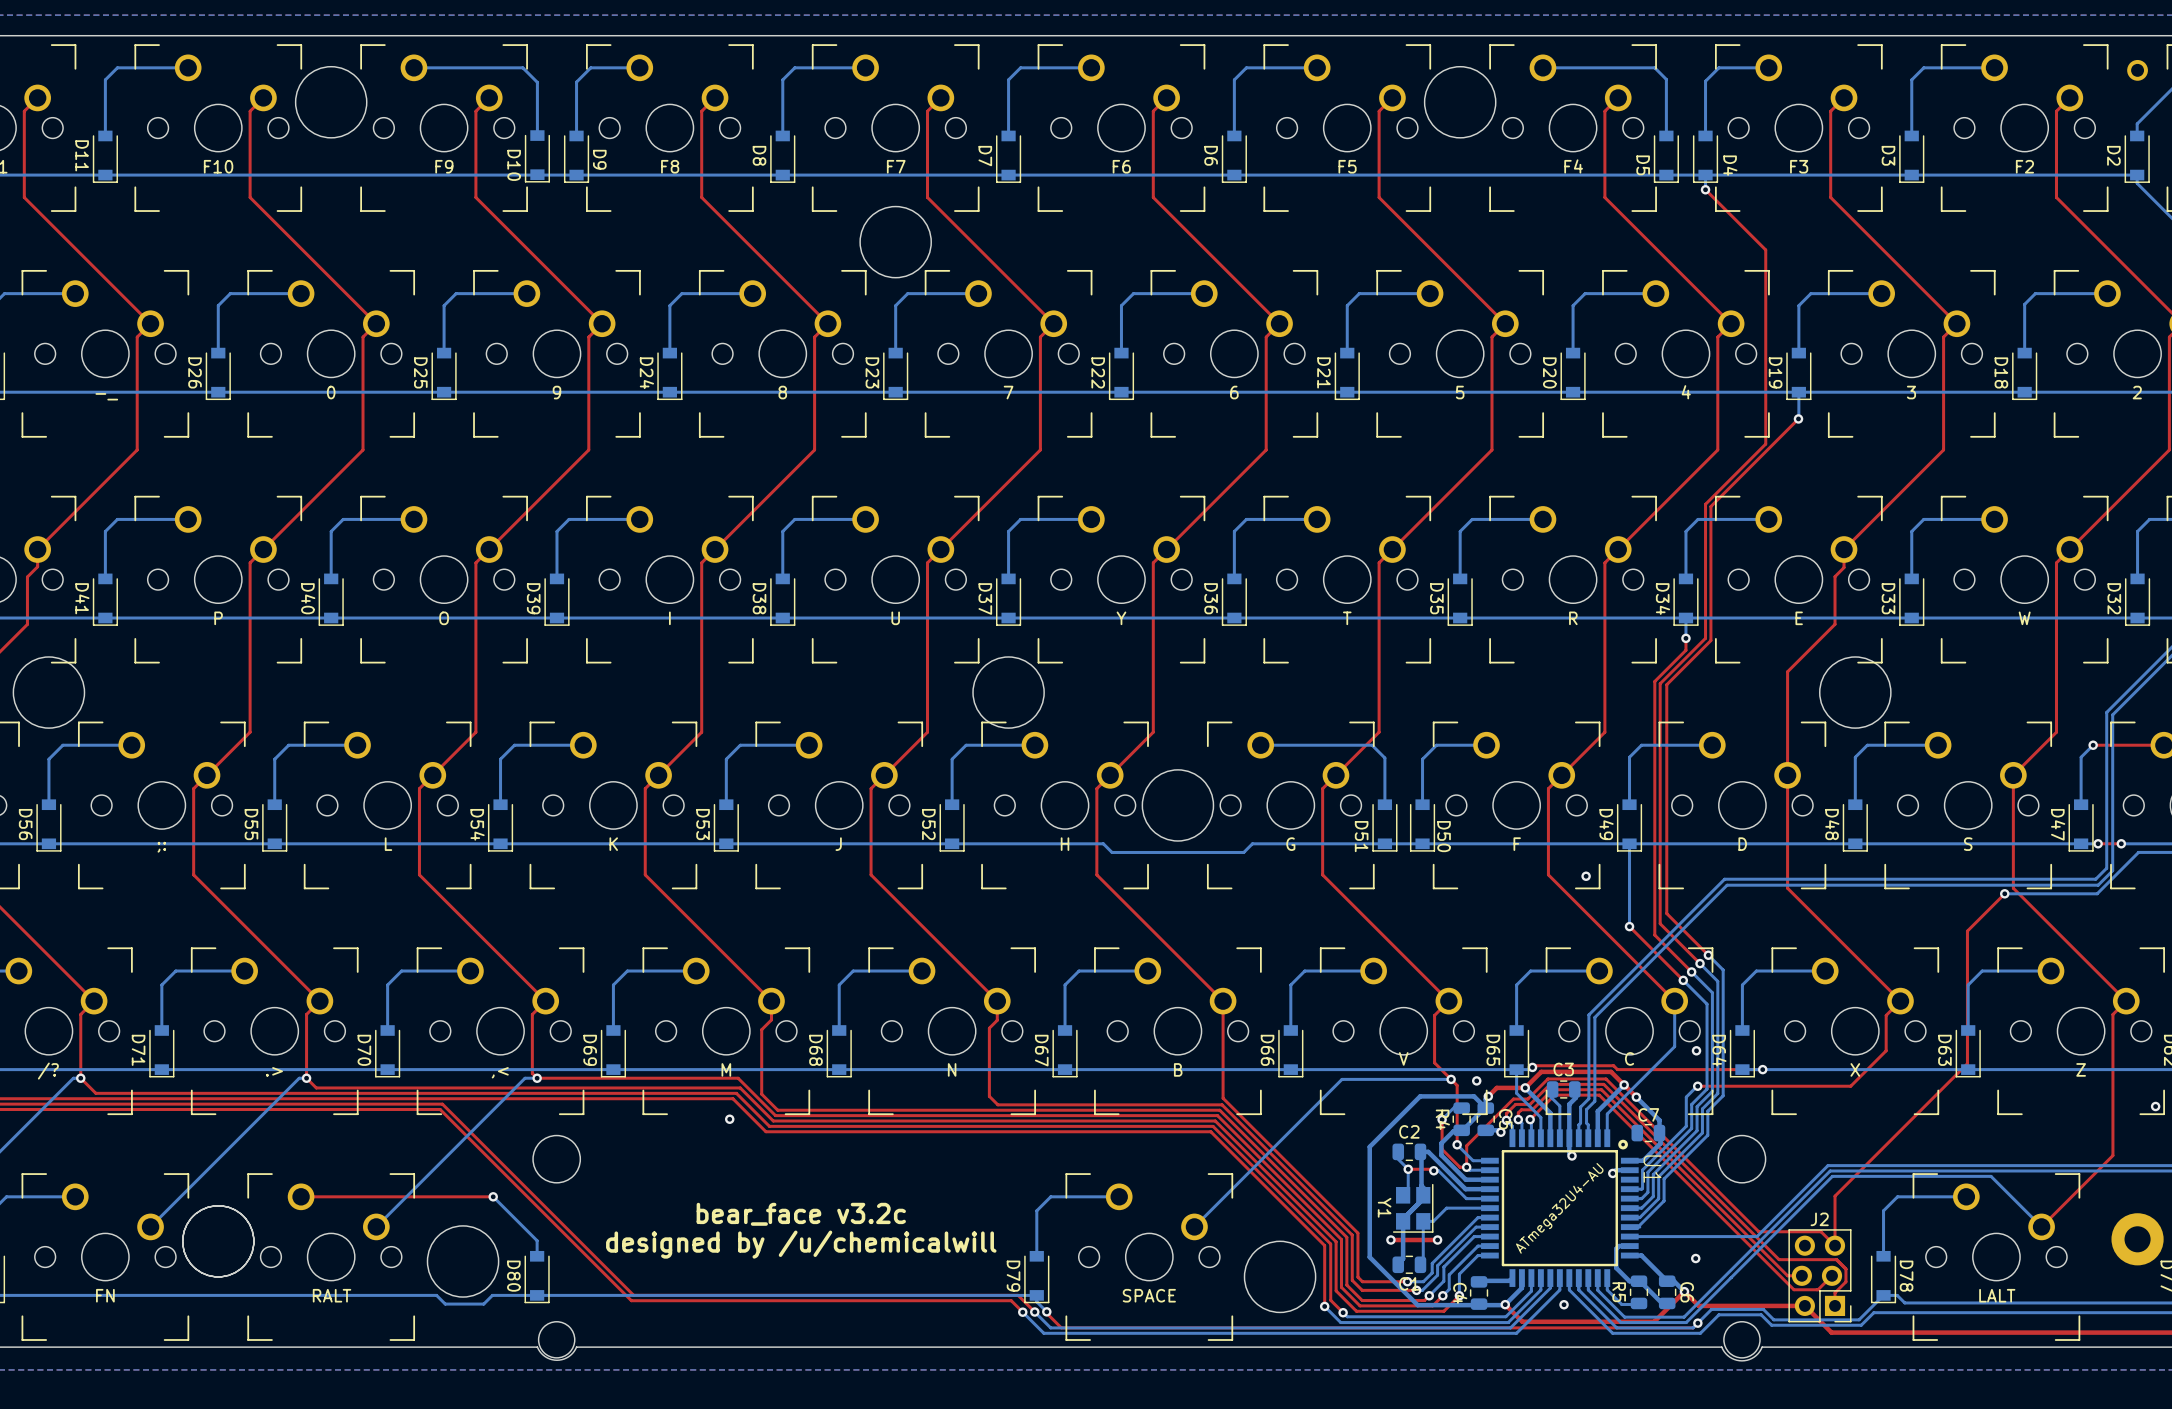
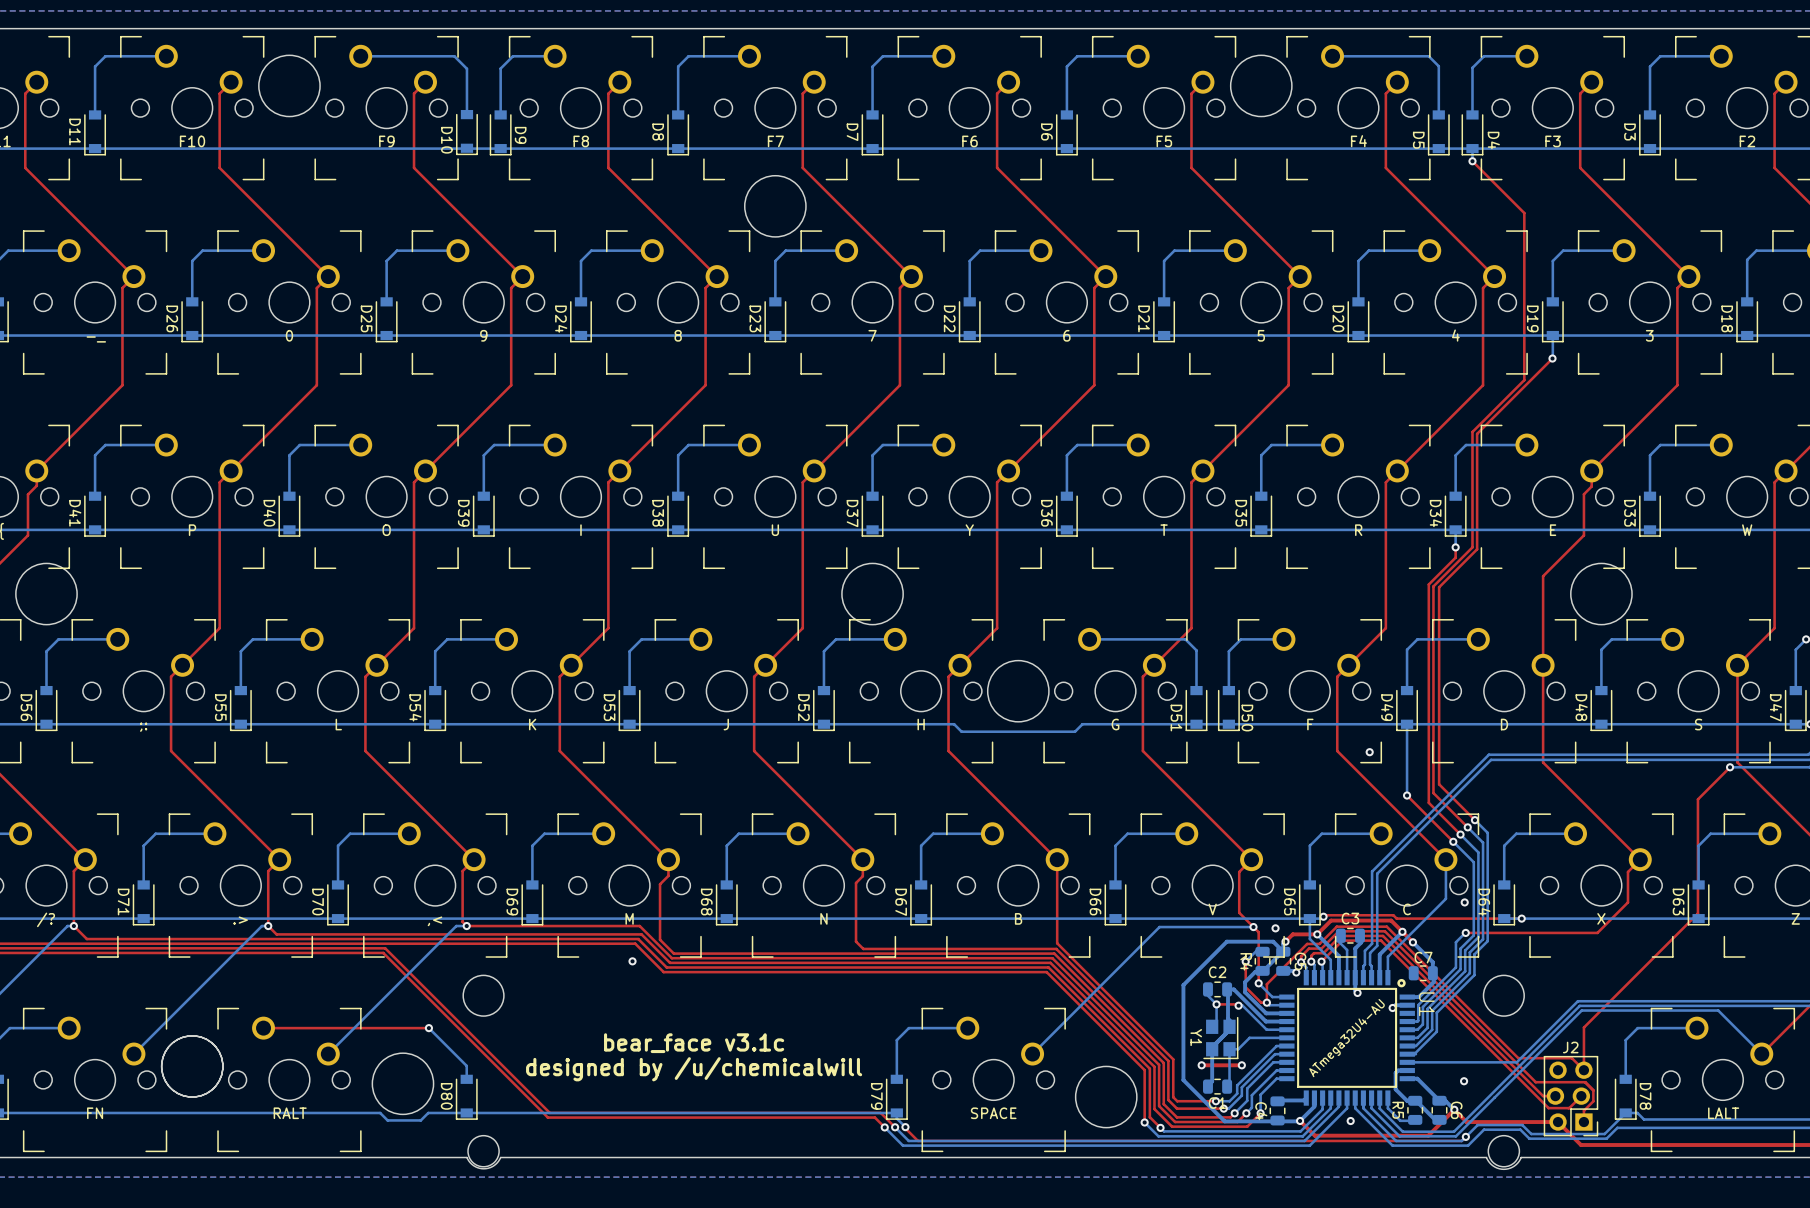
text: bear_face v3.2c (801, 1214) -> bear_face v3.1c (694, 1043)

